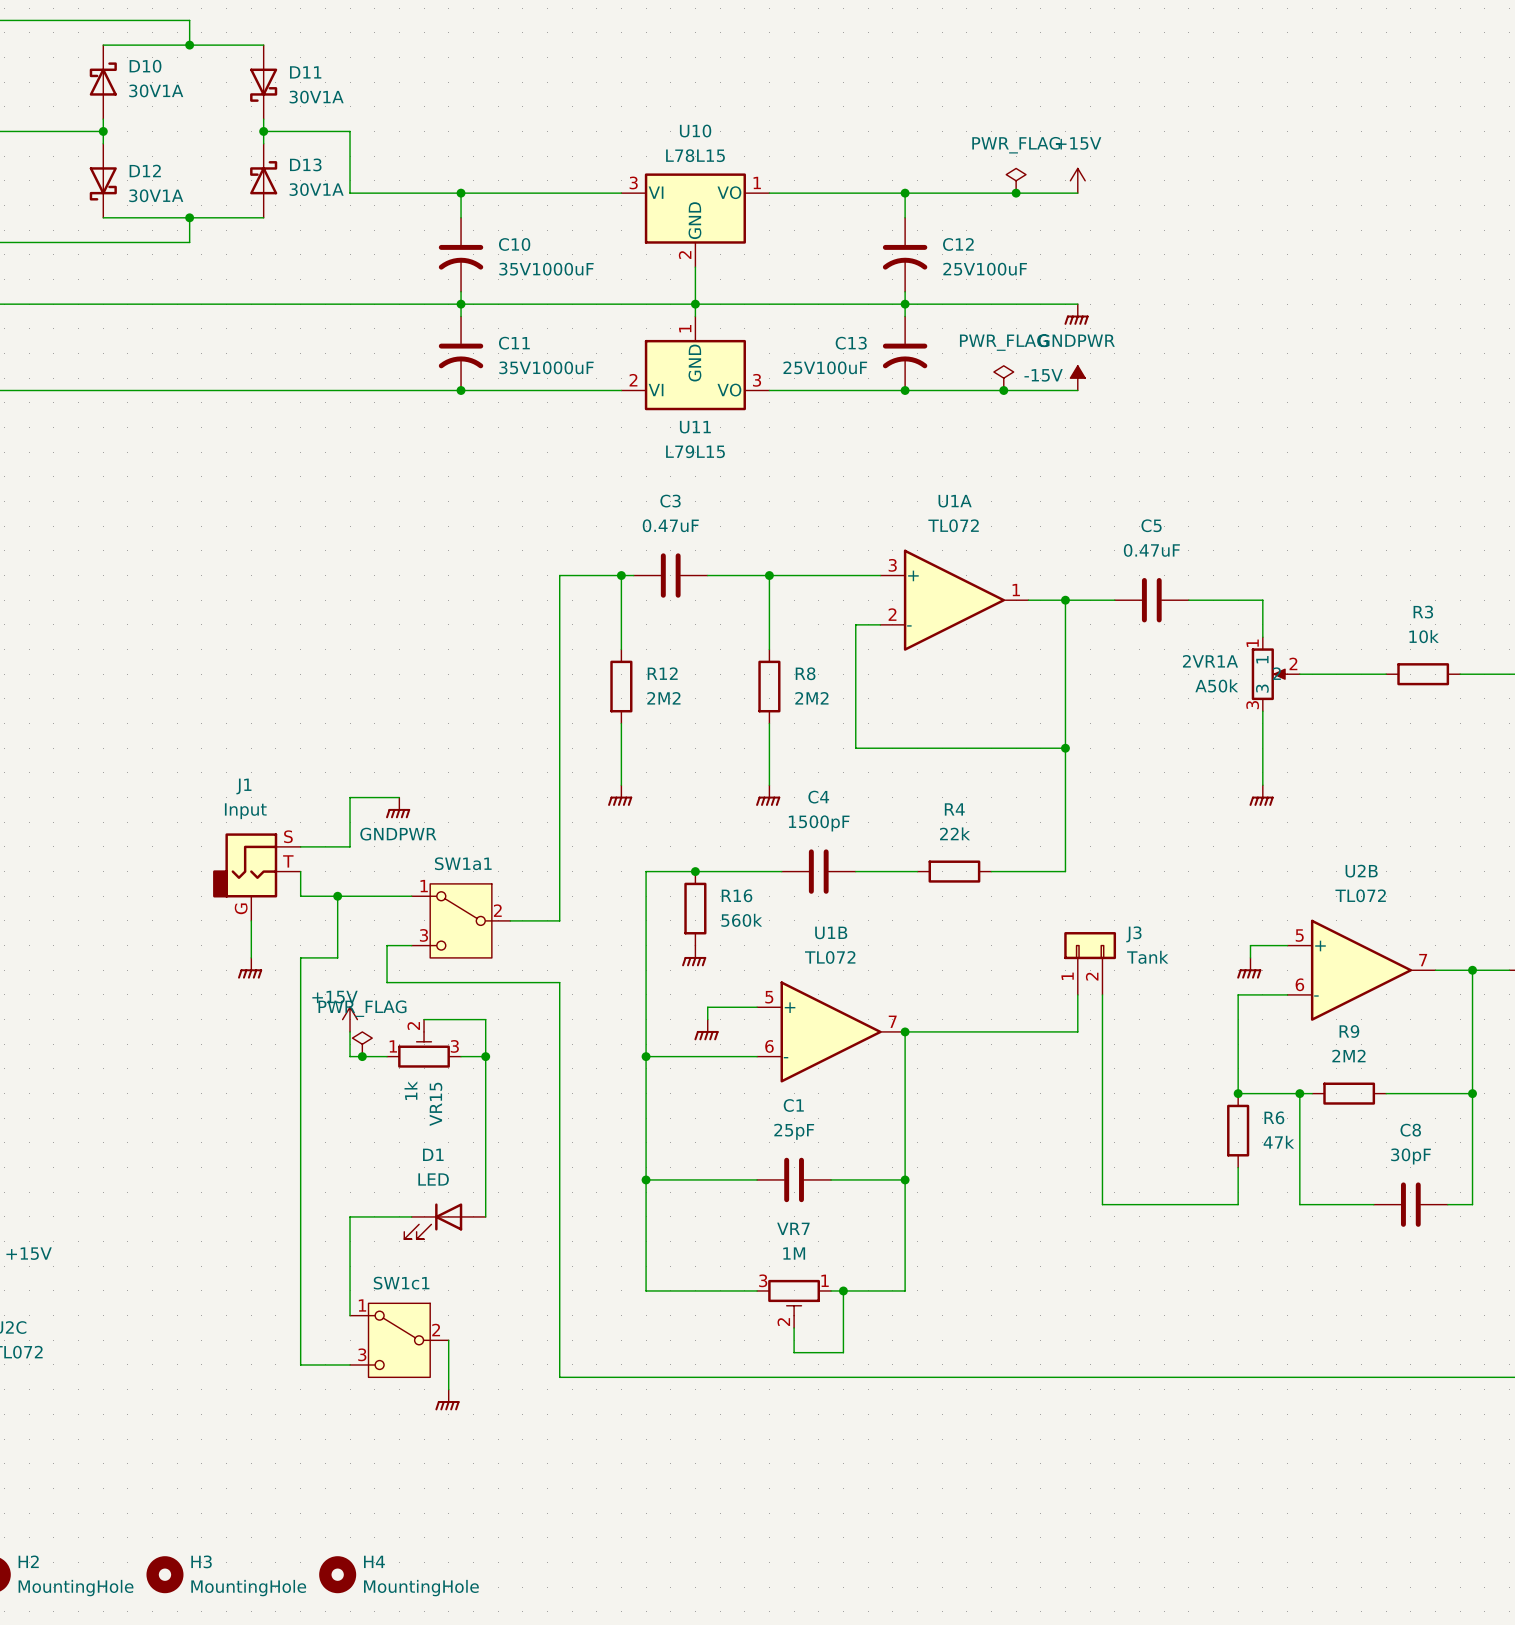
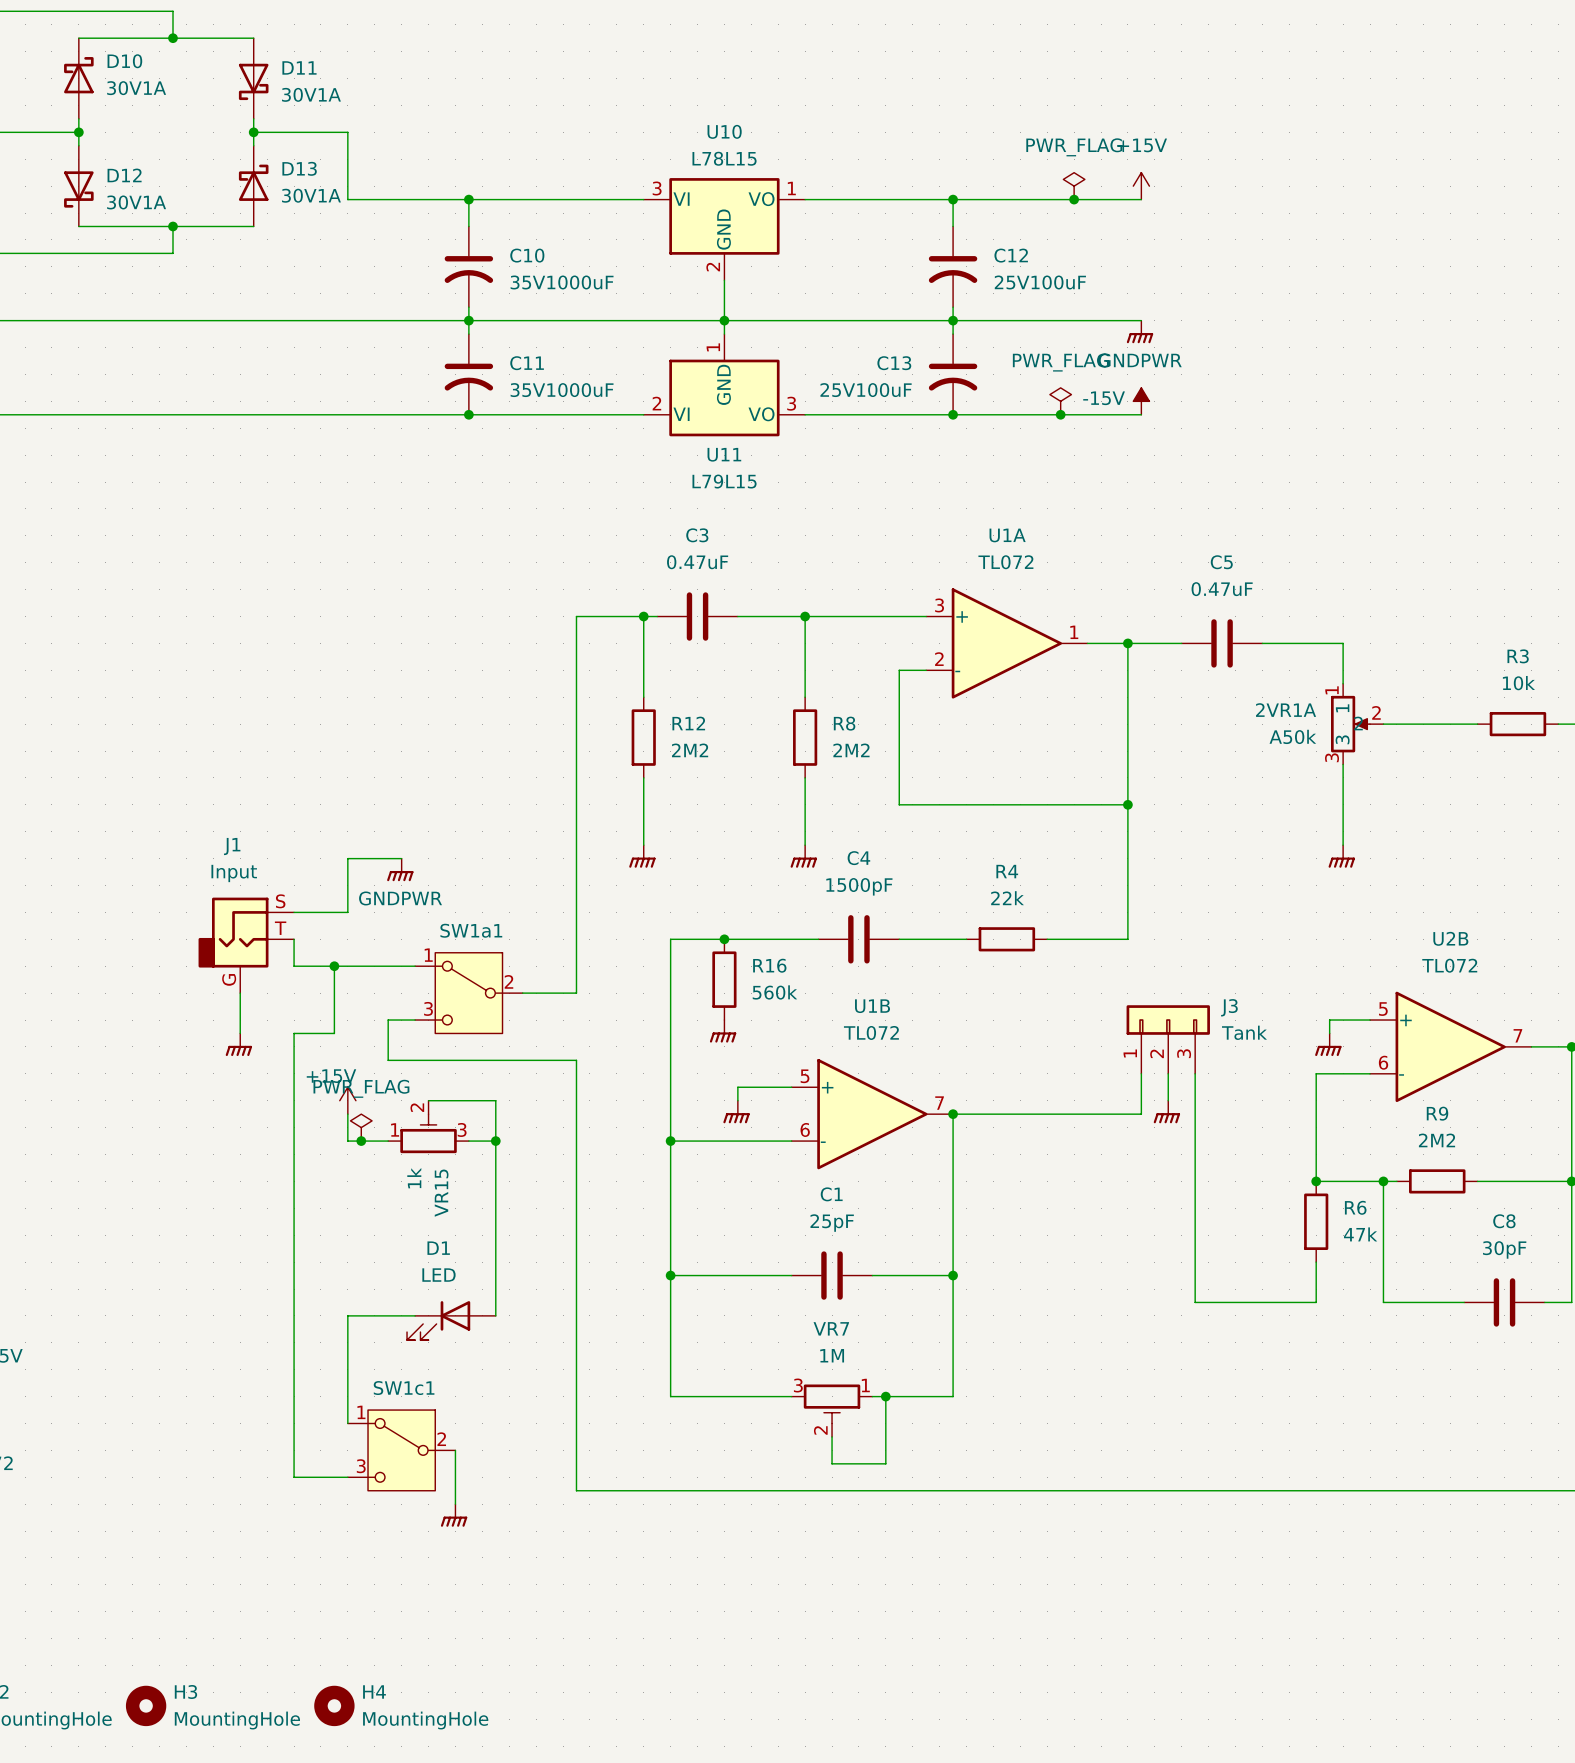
J3 symbol: [1064, 932, 1117, 995] -> [1126, 1005, 1210, 1074]
wire: (1102, 1019) (1102, 1204) (1127, 1204) -> (1195, 1073) (1195, 1302)
power symbol: none -> (1166, 1112)

